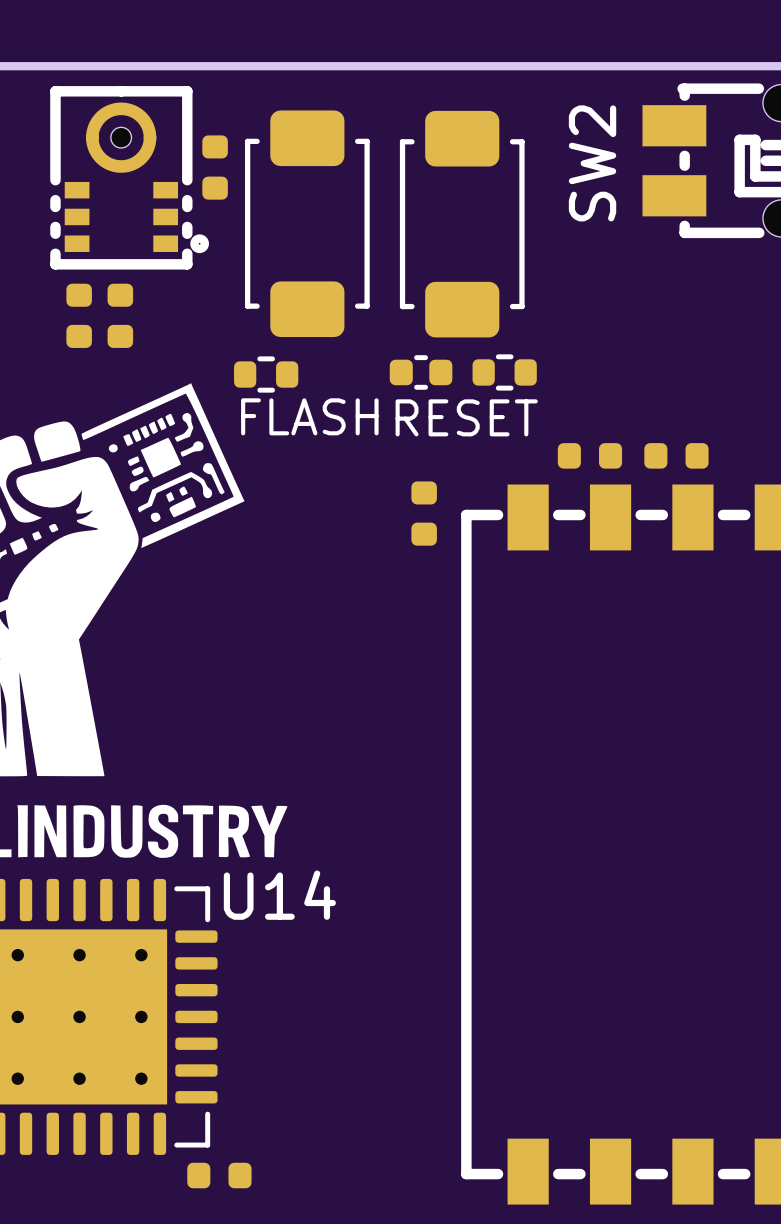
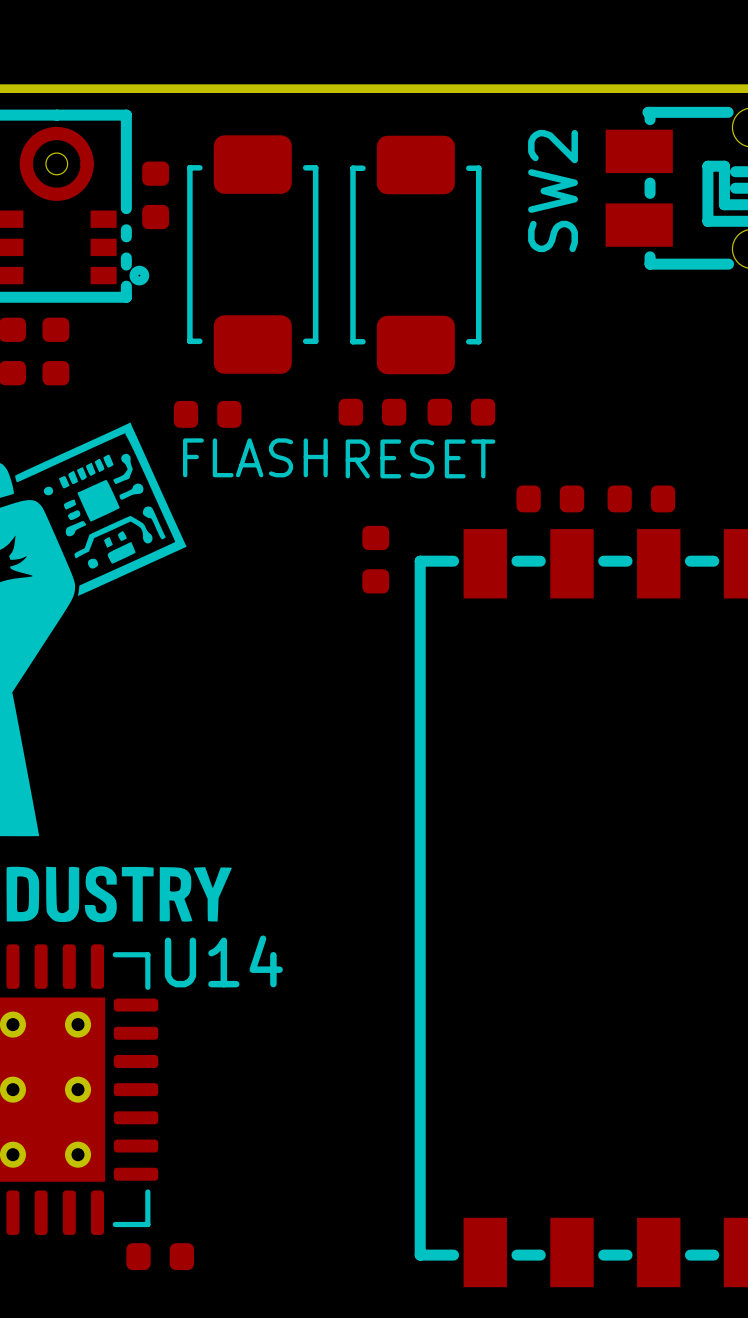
part footprint: [472, 354, 537, 391] -> [427, 398, 496, 426]
part footprint: [389, 355, 453, 390] -> [338, 398, 407, 426]
part footprint: [234, 356, 299, 393] -> [173, 400, 242, 428]

